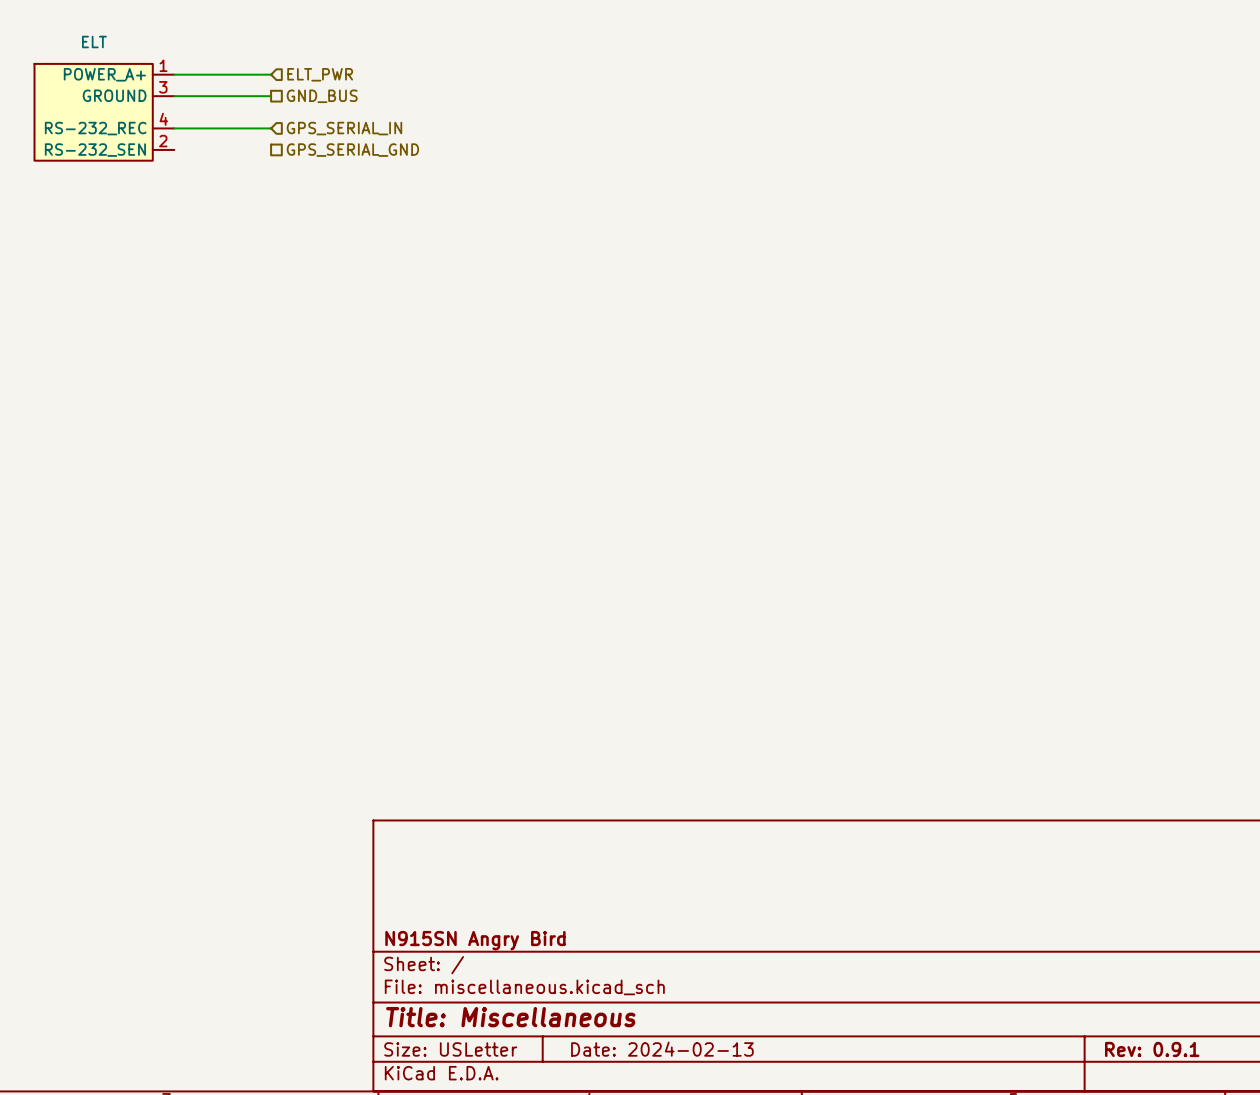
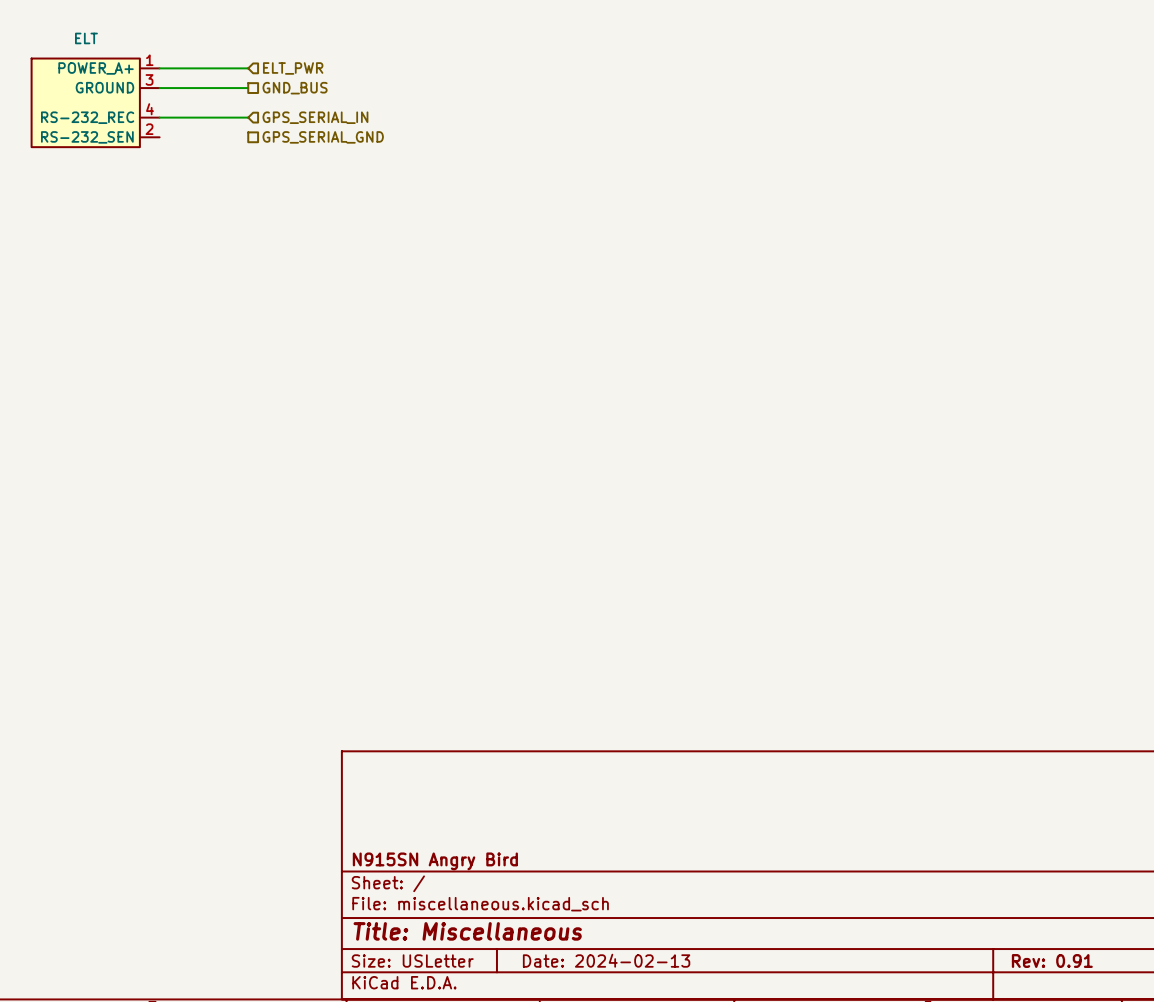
title block: Rev: 0.9.1 (1152, 1049) -> Rev: 0.91 (1052, 961)

